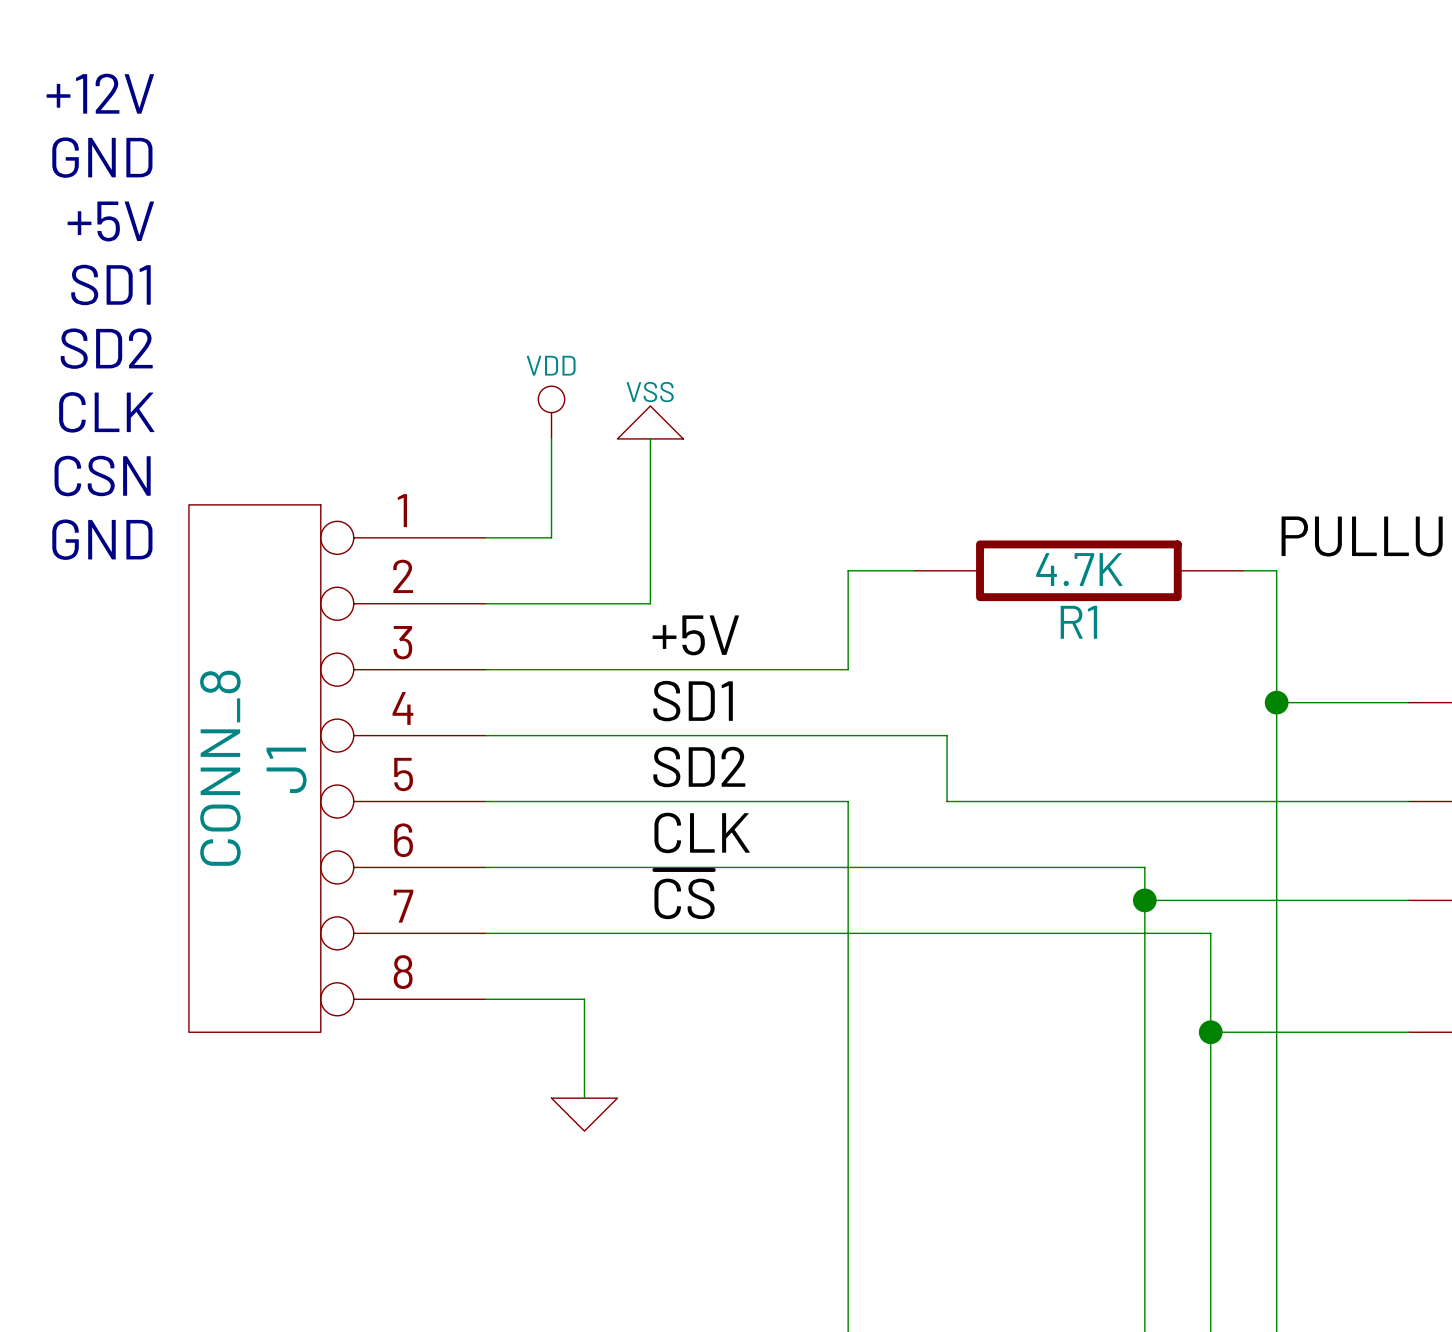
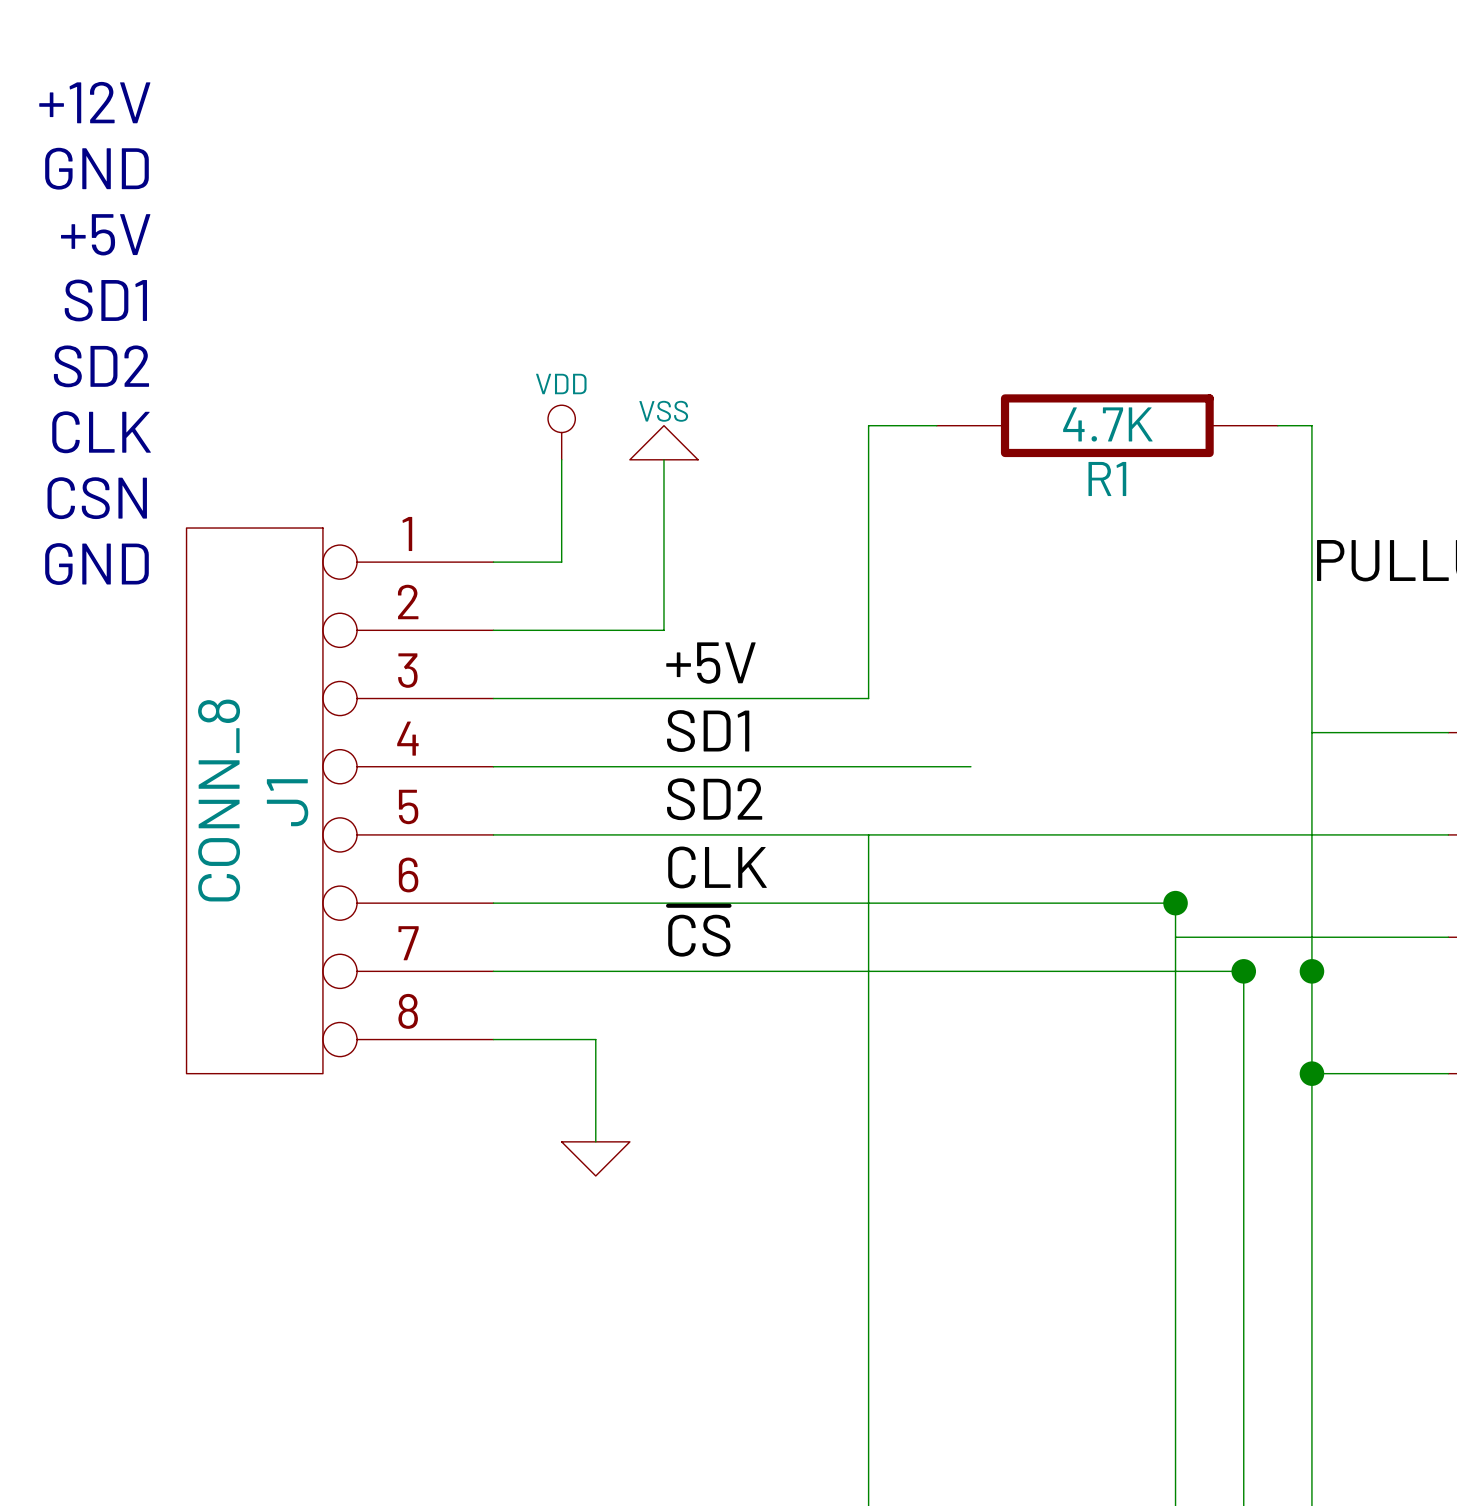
wire: (848, 570) (914, 570) -> (868, 596) (868, 425) (936, 425)
R1 position: (1078, 570) -> (1107, 425)
wire: (1243, 570) (1276, 570) -> (1277, 425) (1311, 425) (1311, 596)
junction: (1276, 702) -> none
wire: (947, 735) (947, 801) -> (868, 834) (970, 834)
junction position: (1144, 900) -> (1175, 903)
junction: none -> (1243, 971)
junction: none -> (1311, 971)
wire: (1210, 1032) (1276, 1032) -> none
junction: (1210, 1032) -> none
junction: none -> (1311, 1073)

